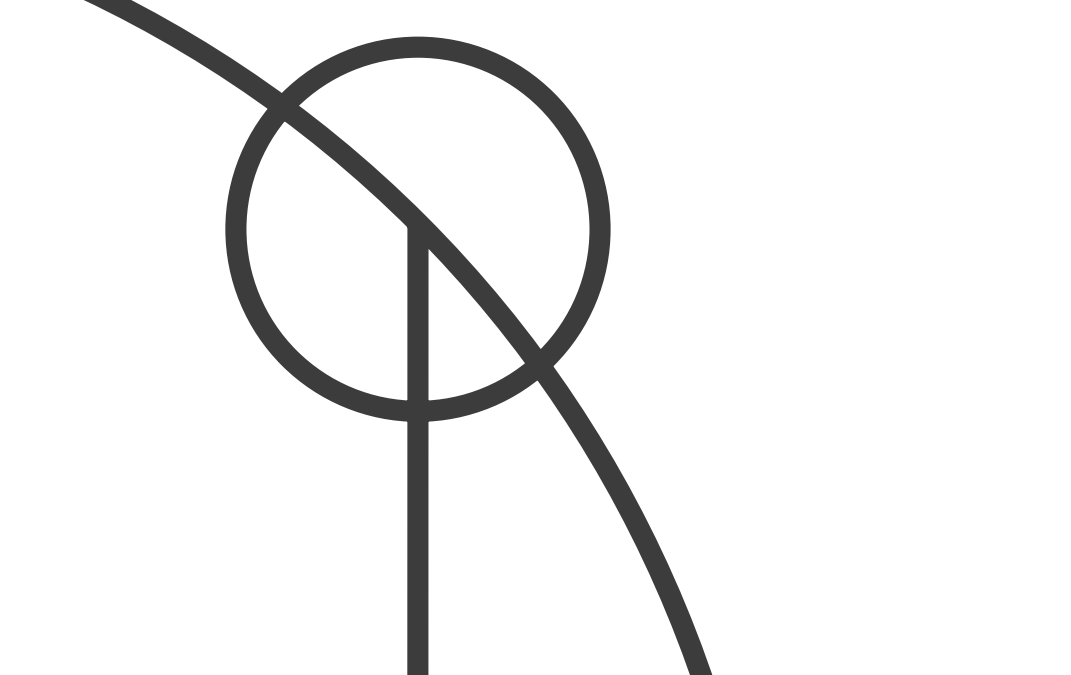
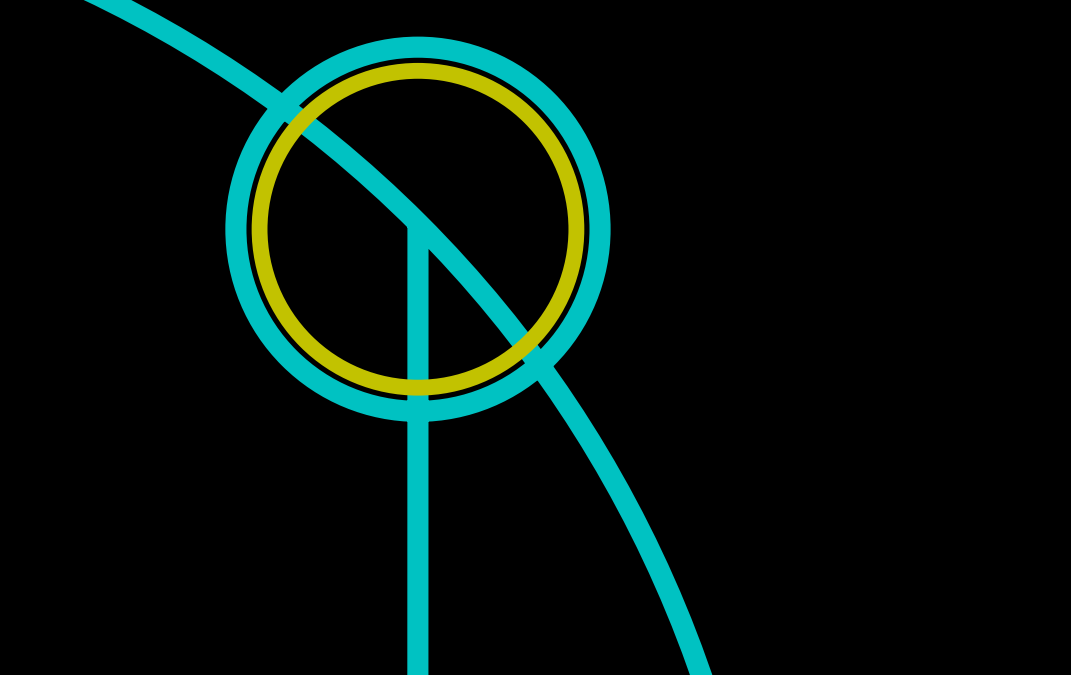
round board edge: none -> [251, 62, 585, 396]

